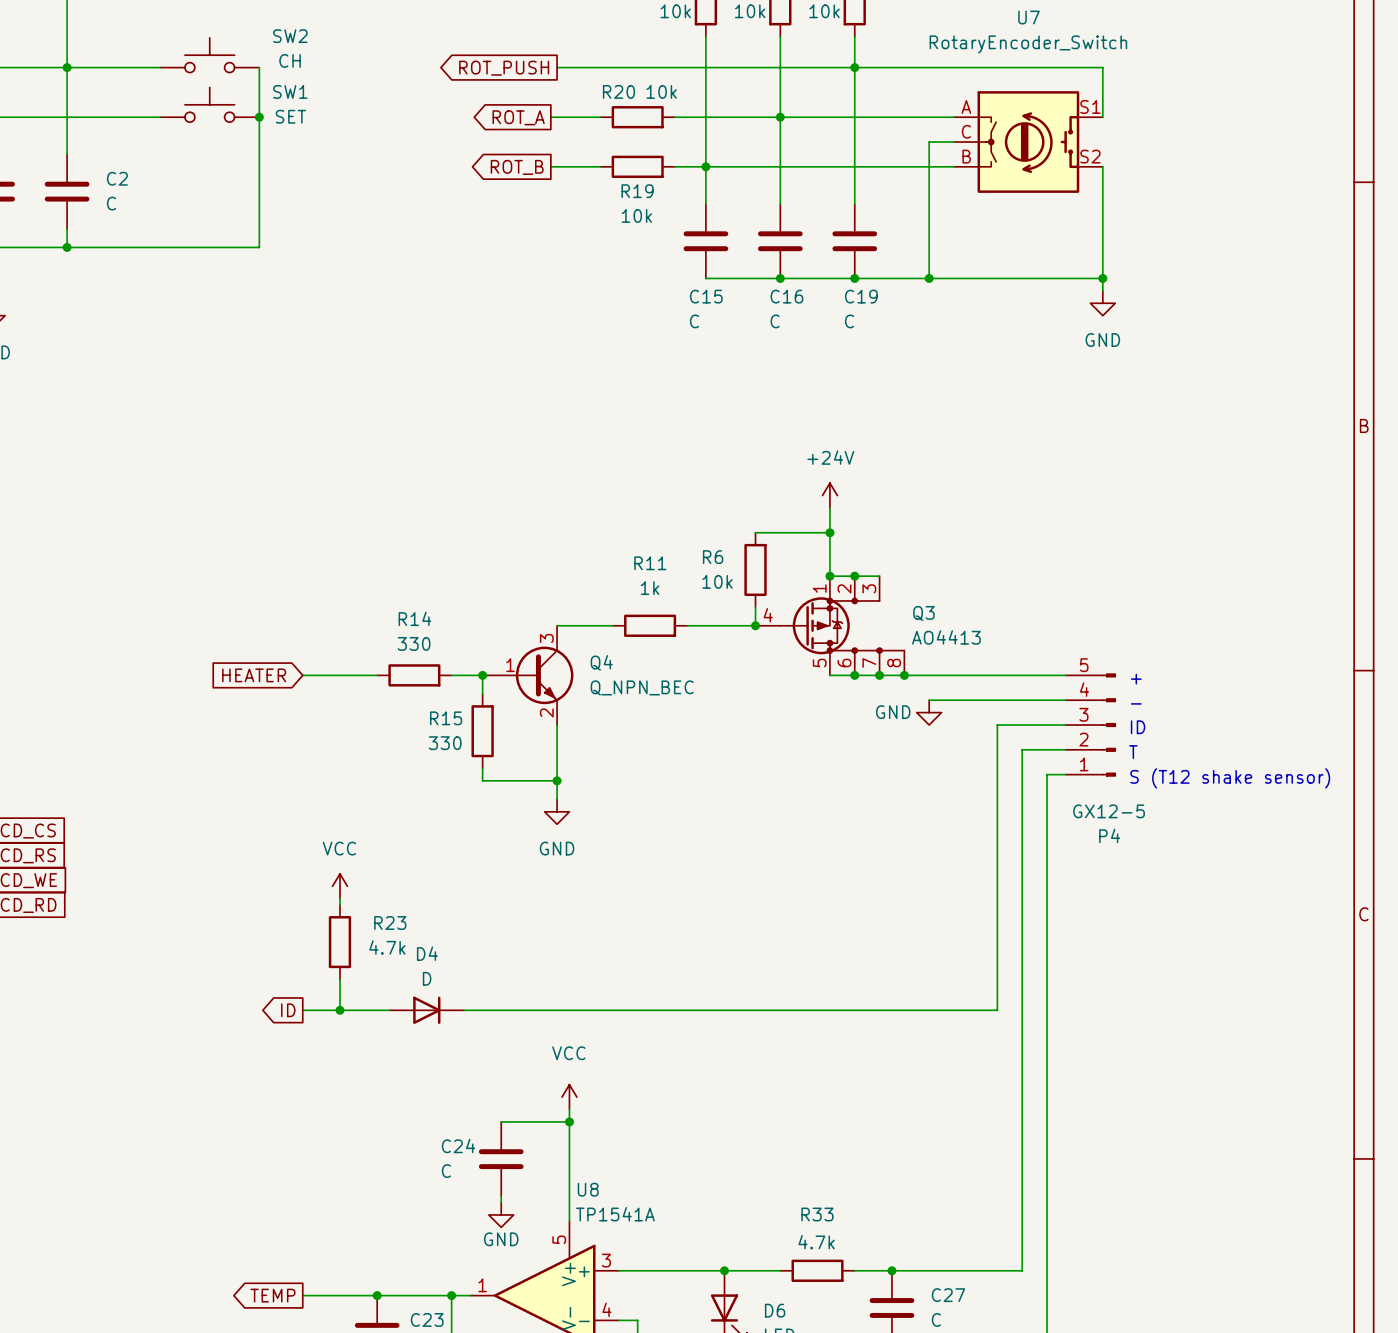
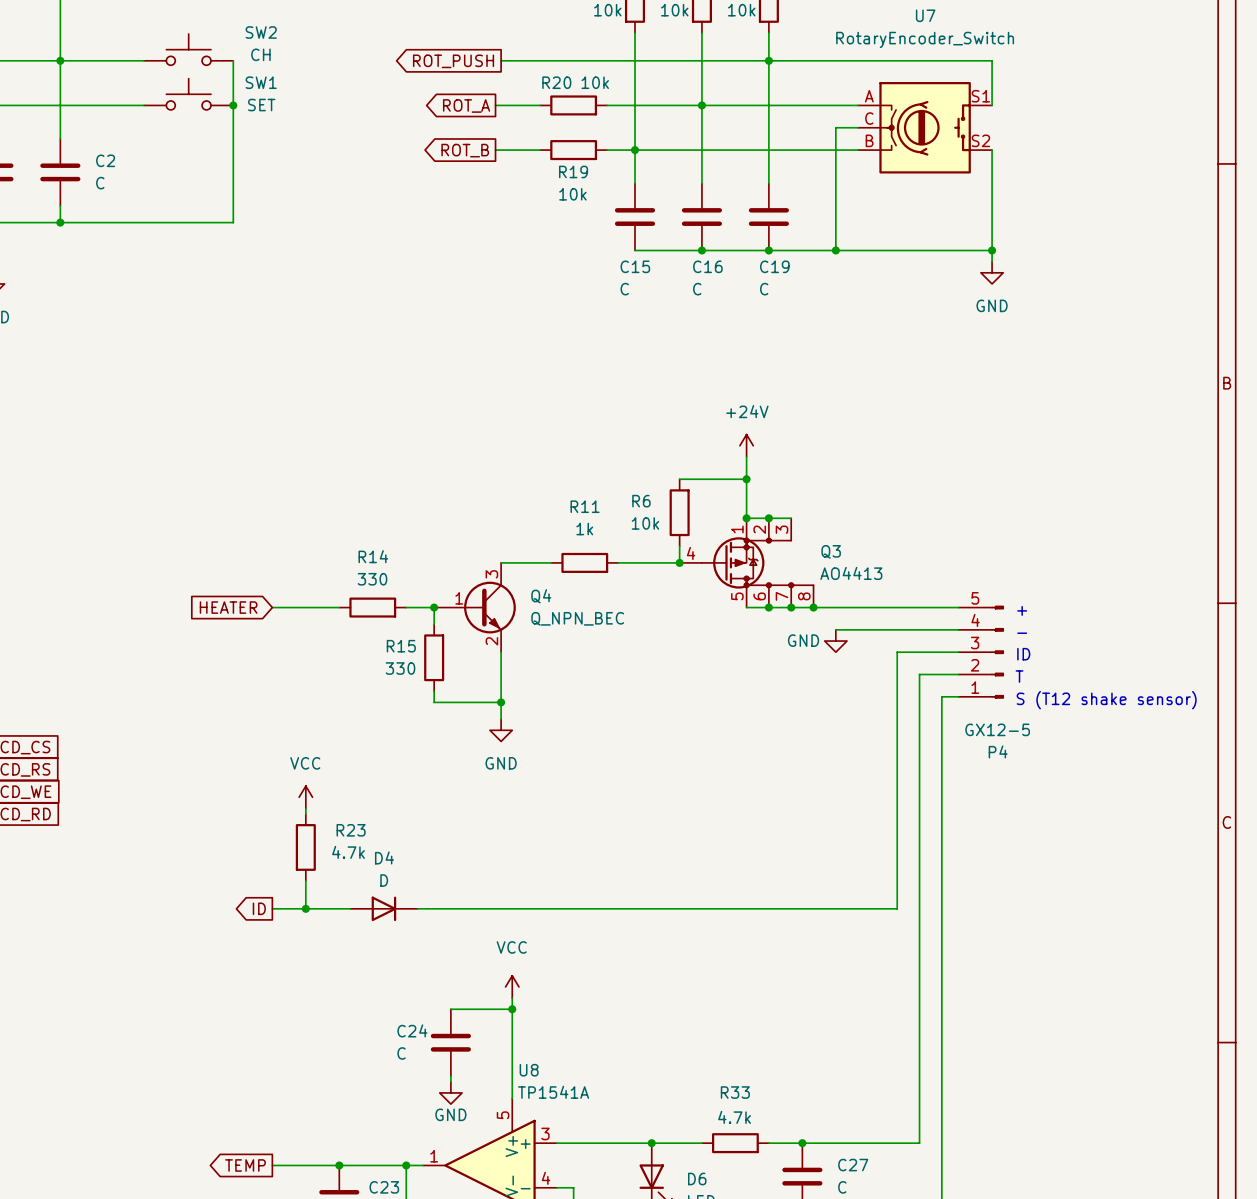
U7 symbol: [953, 91, 1103, 193] -> [858, 82, 993, 174]

